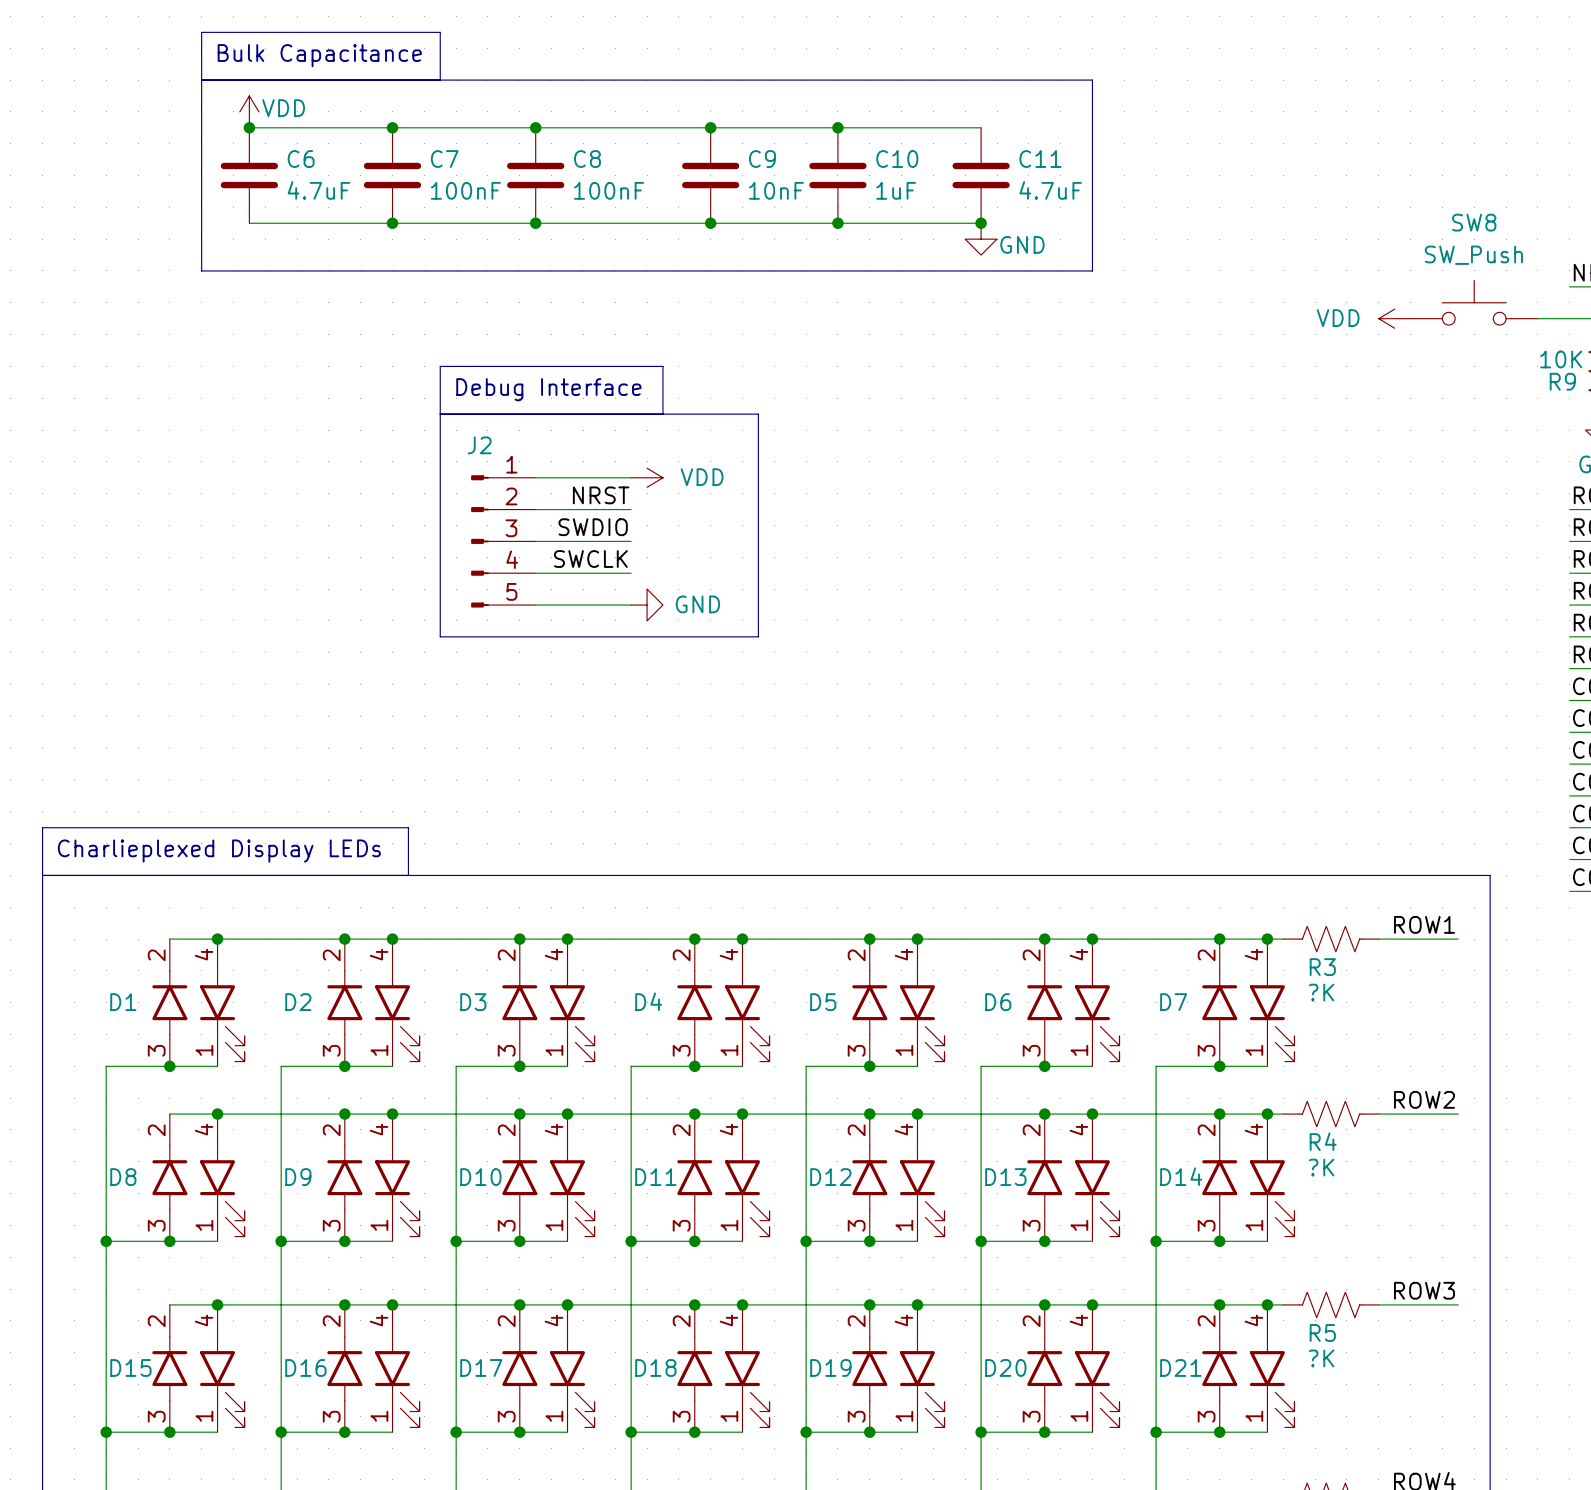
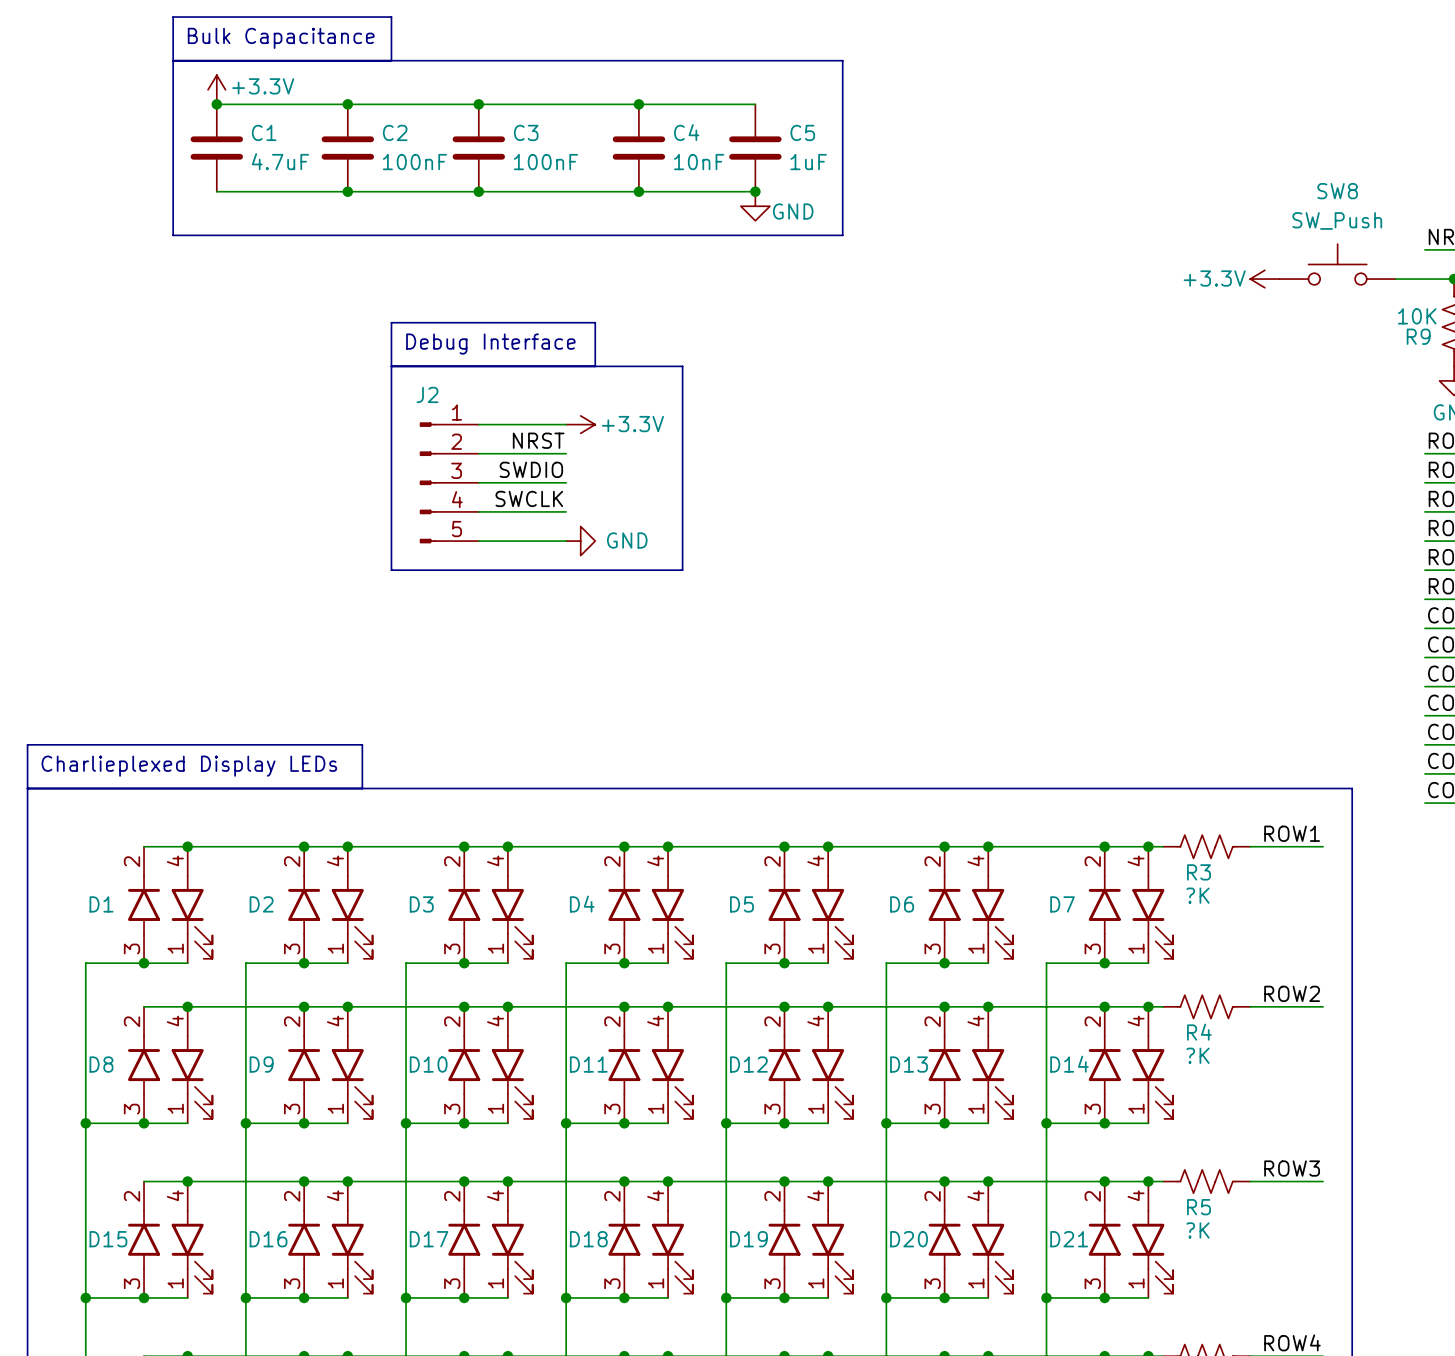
line: (933, 80) (1092, 80) (1092, 270) (933, 270) -> (842, 60) (842, 235)
power symbol: VDD (249, 111) -> +3.3V (216, 89)
wire: (837, 127) (981, 127) -> none
junction: (837, 127) -> none
C6 name: C6 (301, 159) -> C1 (264, 132)
C7 name: C7 (444, 159) -> C2 (395, 132)
C8 name: C8 (587, 159) -> C3 (526, 132)
C9 name: C9 (762, 159) -> C4 (686, 132)
C10 name: C10 (897, 159) -> C5 (802, 132)
C11: 4.7uF (981, 175) -> none
wire: (837, 223) (981, 223) -> none
junction: (981, 223) -> none
power symbol position: GND (981, 239) -> GND (755, 206)
power symbol: VDD (1394, 318) -> +3.3V (1264, 279)
power symbol: VDD (647, 477) -> +3.3V (580, 424)

